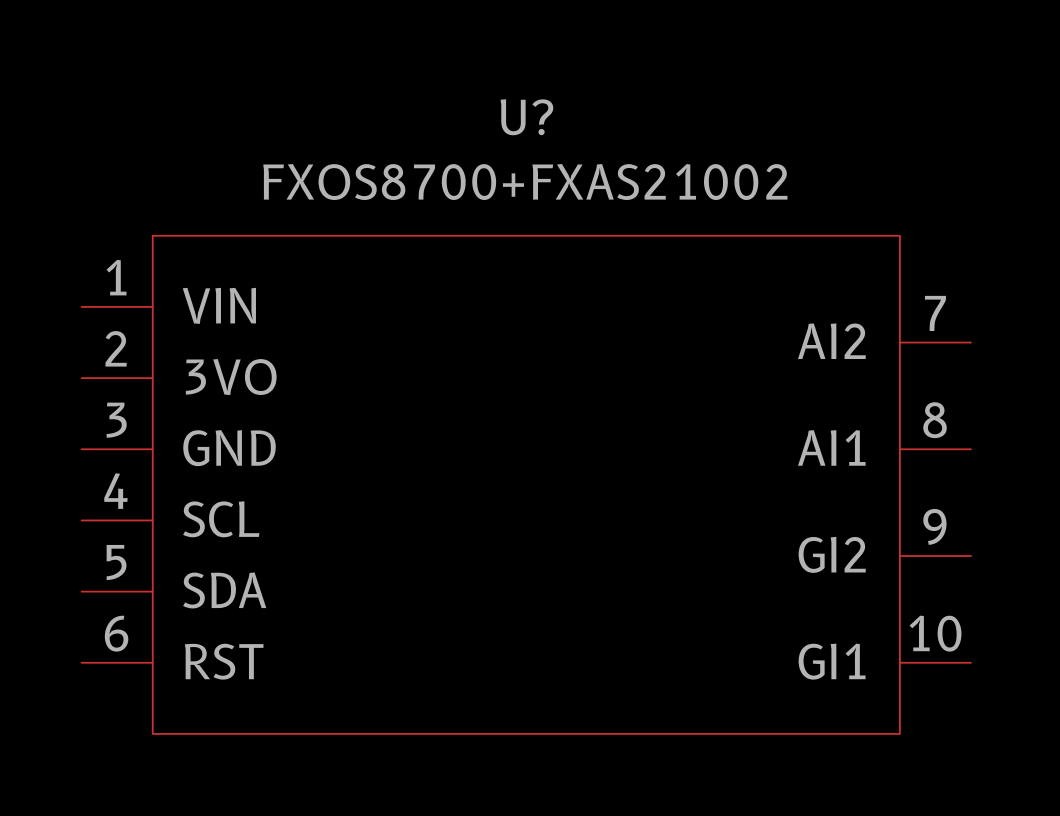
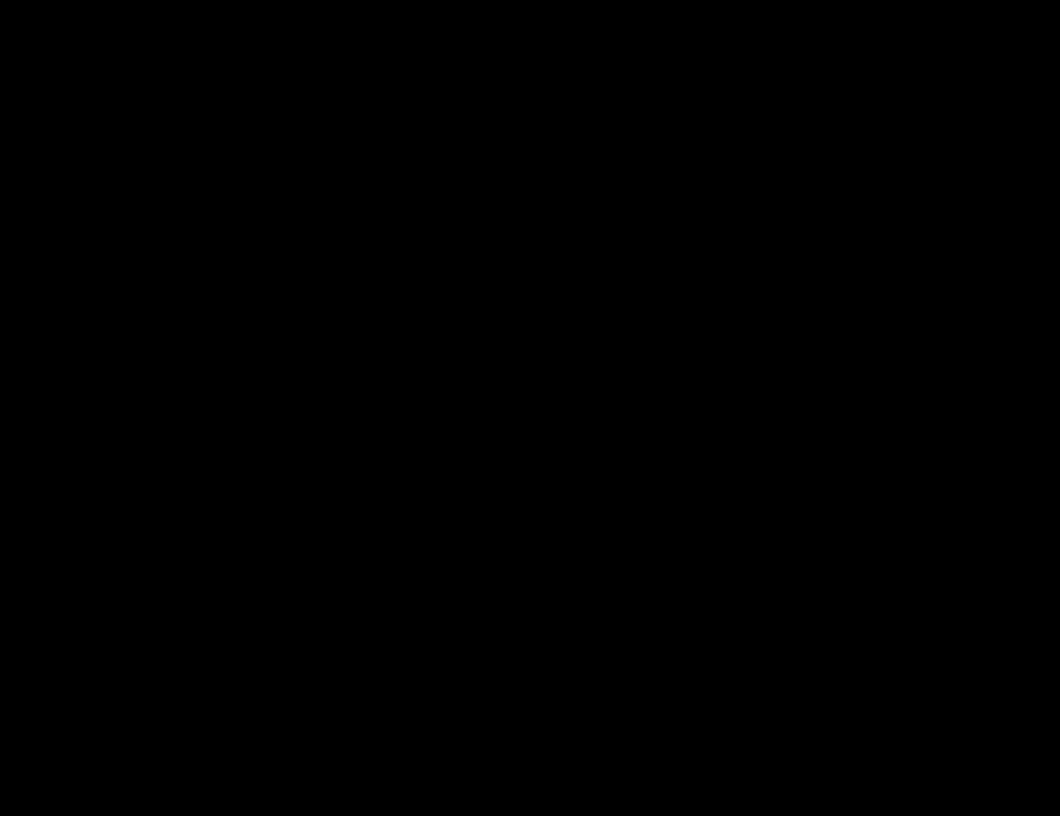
U?: FXOS8700+FXAS21002 (526, 484) -> none

